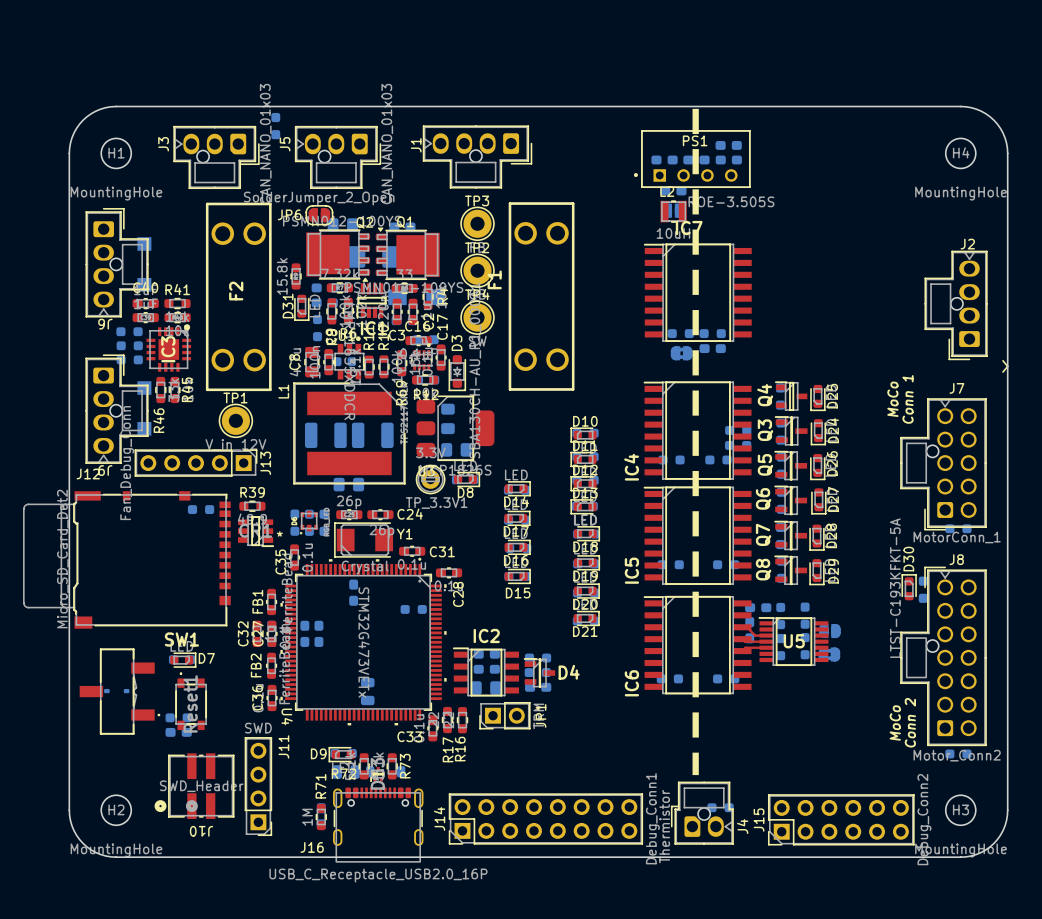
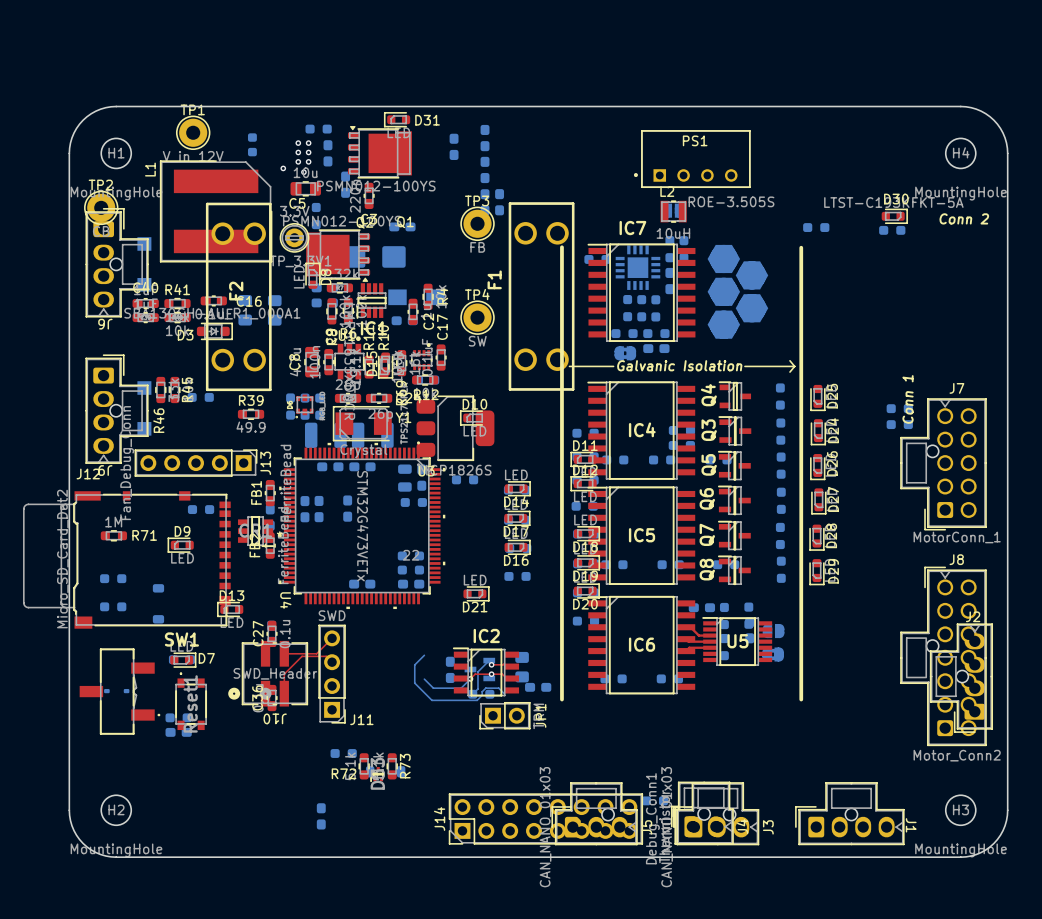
line: (695, 108) (695, 775) -> none
part: (275, 126) -> none
part: none -> (485, 138)
via: none -> (298, 143)
via: none -> (308, 143)
part: none -> (252, 144)
part: (728, 145) -> none
part: none -> (454, 146)
via: none -> (298, 152)
via: none -> (308, 152)
part: none -> (327, 153)
J1 rotation: 0° (477, 156) -> 180° (849, 813)
J1 position: (477, 156) -> (849, 813)
J3 rotation: 0° (216, 157) -> 180° (716, 813)
J3 position: (216, 157) -> (716, 813)
J5 rotation: 0° (338, 157) -> 180° (594, 813)
J5 position: (338, 157) -> (594, 813)
part: (664, 159) -> none
part: (696, 159) -> none
part: (728, 159) -> none
via: none -> (298, 161)
via: none -> (308, 161)
via: none -> (283, 168)
part: none -> (485, 169)
via: none -> (303, 172)
part: none -> (345, 184)
part: (673, 190) -> none
part: none -> (485, 202)
part: none -> (499, 202)
JP6: SolderJumper_2_Open (319, 215) -> none
text: none -> Conn 2 (964, 218)
C5 side: bottom (342, 225) -> top (305, 188)
part: none -> (816, 227)
part: none -> (892, 230)
line: none -> (561, 247) (561, 699)
line: none -> (801, 247) (801, 699)
part: none -> (669, 249)
part: none -> (683, 249)
Q1 position: (407, 253) -> (379, 152)
part: none -> (723, 258)
part: none -> (597, 259)
part: none -> (637, 267)
TP2 position: (477, 270) -> (101, 207)
part: none -> (751, 275)
part side: top (296, 276) -> bottom (316, 216)
part: none -> (669, 281)
part side: top (404, 288) -> bottom (318, 129)
part: none -> (723, 291)
IC7 position: (697, 292) -> (641, 292)
J2 position: (956, 305) -> (961, 678)
D31 name position: D31 (288, 306) -> D31 (427, 120)
D31 rotation: 0° (301, 307) -> 90° clockwise (397, 119)
D31 position: (301, 307) -> (397, 119)
part: none -> (627, 308)
part: none -> (641, 308)
part: none -> (655, 308)
part: none -> (751, 308)
part: none -> (245, 310)
part: none -> (274, 310)
C3 position: (397, 311) -> (369, 195)
part: none -> (723, 324)
C16 name position: C16 (417, 326) -> C16 (249, 301)
part: (317, 328) -> none
part: (129, 331) -> none
part: none -> (624, 333)
part: none -> (656, 333)
part: (680, 333) -> none
part: (712, 333) -> none
part: (425, 339) -> none
C16 position: (418, 340) -> (213, 300)
part: (129, 345) -> none
IC3: (168, 348) -> none
part: none -> (656, 348)
part: (712, 348) -> none
part position: (681, 353) -> (625, 353)
part: (129, 359) -> none
line: none -> (789, 360) (794, 366)
line: (1002, 360) (1007, 366) (1002, 372) -> none
part: (344, 361) -> none
text: none -> Galvanic Isolation (679, 365)
line: none -> (569, 366) (613, 366)
line: none -> (744, 366) (794, 366)
line: none -> (794, 366) (789, 372)
D3 rotation: 0° (457, 373) -> 90° counterclockwise (214, 331)
D3 position: (457, 373) -> (214, 331)
Q4 position: (791, 396) -> (734, 396)
part: none -> (200, 397)
text: MoCo (892, 399) -> none
part: none -> (290, 406)
part: none -> (305, 406)
part: none -> (319, 406)
part: none -> (899, 408)
part: (447, 418) -> none
TP1 position: (235, 420) -> (193, 132)
part: none -> (899, 424)
part: none -> (681, 430)
IC4 position: (697, 430) -> (641, 430)
part: (738, 430) -> none
Q3 position: (791, 430) -> (734, 430)
L1 position: (349, 433) -> (216, 211)
D10 position: (583, 435) -> (473, 418)
part: none -> (681, 445)
part: (738, 445) -> none
part: (456, 449) -> none
part: none -> (615, 459)
part: none -> (662, 459)
part: (671, 459) -> none
Q5 position: (790, 465) -> (734, 465)
part: none -> (362, 466)
IC4 name rotation: 0° (631, 467) -> 90° clockwise (642, 429)
part: none -> (404, 478)
TP_3.3V1 position: (430, 479) -> (294, 237)
D8 rotation: 0° (466, 479) -> 90° counterclockwise (312, 275)
D8 position: (466, 479) -> (312, 275)
part: (348, 484) -> none
Q6 position: (790, 500) -> (734, 500)
part: none -> (413, 502)
R39 position: (252, 506) -> (251, 414)
D13 position: (583, 506) -> (230, 609)
part: none -> (347, 508)
part: none -> (304, 509)
part position: (349, 514) -> (348, 398)
C24 position: (380, 514) -> (379, 398)
part: none -> (270, 517)
part: (294, 522) -> none
part position: (308, 522) -> (304, 406)
part: (309, 522) -> none
part: (323, 522) -> none
part: (958, 528) -> none
IC5 position: (697, 535) -> (641, 535)
Q7 position: (790, 535) -> (734, 535)
Y1 position: (363, 540) -> (362, 423)
C31 side: top (412, 551) -> bottom (330, 466)
C35 side: top (294, 557) -> bottom (362, 584)
part: none -> (614, 564)
IC5 name rotation: 0° (631, 570) -> 90° clockwise (642, 535)
Q8 position: (790, 570) -> (734, 570)
C28 side: top (449, 572) -> bottom (421, 477)
D15 rotation: 0° (517, 576) -> 90° clockwise (385, 365)
D15 position: (517, 576) -> (385, 365)
part: none -> (113, 578)
D30 rotation: 0° (909, 587) -> 90° clockwise (894, 216)
D30 position: (909, 587) -> (894, 216)
part: (923, 589) -> none
part: (353, 592) -> none
FB1 position: (271, 601) -> (270, 493)
part: none -> (158, 603)
part: none -> (113, 606)
part position: (758, 607) -> (701, 607)
part: (413, 609) -> none
part: none -> (748, 615)
part: (805, 615) -> none
part: none -> (724, 616)
part: (780, 616) -> none
D21 position: (586, 618) -> (476, 593)
top track: (742, 627) (746, 627) (755, 635) (766, 635) -> (686, 627) (690, 627) (698, 635) (710, 635)
part position: (829, 631) -> (773, 631)
C32 side: top (257, 633) -> bottom (319, 509)
part: (304, 633) -> none
part: (318, 633) -> none
top track: none -> (332, 638) (316, 653) (284, 653)
top track: (742, 639) (744, 641) (766, 641) -> (686, 639) (688, 641) (710, 641)
U4 position: (363, 641) -> (362, 525)
U5 position: (793, 641) -> (737, 641)
IC6 position: (697, 645) -> (641, 645)
part: (805, 646) -> none
part: none -> (724, 647)
top track: (766, 647) (745, 647) (742, 651) -> (710, 647) (689, 647) (686, 651)
part: (780, 647) -> none
part rotation: 0° (486, 654) -> 90° clockwise (450, 669)
part position: (486, 654) -> (450, 669)
part position: (829, 654) -> (773, 654)
bottom track: none -> (424, 655) (414, 664) (414, 683) (431, 700) (477, 700) (485, 688) (498, 688) (504, 694)
part: (538, 658) -> none
top track: none -> (332, 662) (326, 656) (302, 656) (284, 674) (284, 693)
top track: none -> (503, 663) (491, 664)
part footprint: [473, 664, 500, 674] -> [464, 657, 496, 682]
bottom track: none -> (491, 664) (489, 660) (477, 671) (477, 688) (472, 694)
via: none -> (491, 664)
FB2 position: (271, 665) -> (270, 545)
part: none -> (522, 667)
part: (537, 672) -> none
D4: (539, 672) -> none
via: none -> (491, 674)
top track: none -> (503, 675) (502, 674) (475, 674) (470, 678)
bottom track: none -> (470, 678) (461, 688) (433, 688) (424, 679)
via: none -> (470, 678)
part: none -> (613, 678)
part: (726, 678) -> none
part footprint: [470, 681, 502, 695] -> [468, 689, 495, 699]
IC6 name rotation: 0° (631, 683) -> 90° clockwise (642, 644)
part: (367, 691) -> none
R17 side: top (447, 720) -> bottom (410, 570)
R16 side: top (462, 720) -> bottom (410, 555)
text: MoCo (895, 722) -> none
text: Conn 2 (910, 722) -> none
C33 side: top (432, 728) -> bottom (411, 584)
J11 name rotation: 0° (283, 746) -> 90° clockwise (361, 719)
J11 name position: J11 (283, 746) -> J11 (361, 719)
D9 name position: D9 (318, 753) -> D9 (182, 531)
part: (958, 753) -> none
D9 position: (341, 754) -> (180, 545)
part: (346, 771) -> none
J10 position: (194, 786) -> (268, 673)
J11 position: (258, 786) -> (332, 674)
part position: (720, 807) -> (654, 800)
R71 rotation: 0° (321, 817) -> 90° clockwise (113, 535)
R71 position: (321, 817) -> (113, 535)
J15: Debug_Conn2 (841, 819) -> none
J16: USB_C_Receptacle_USB2.0_16P (378, 824) -> none

